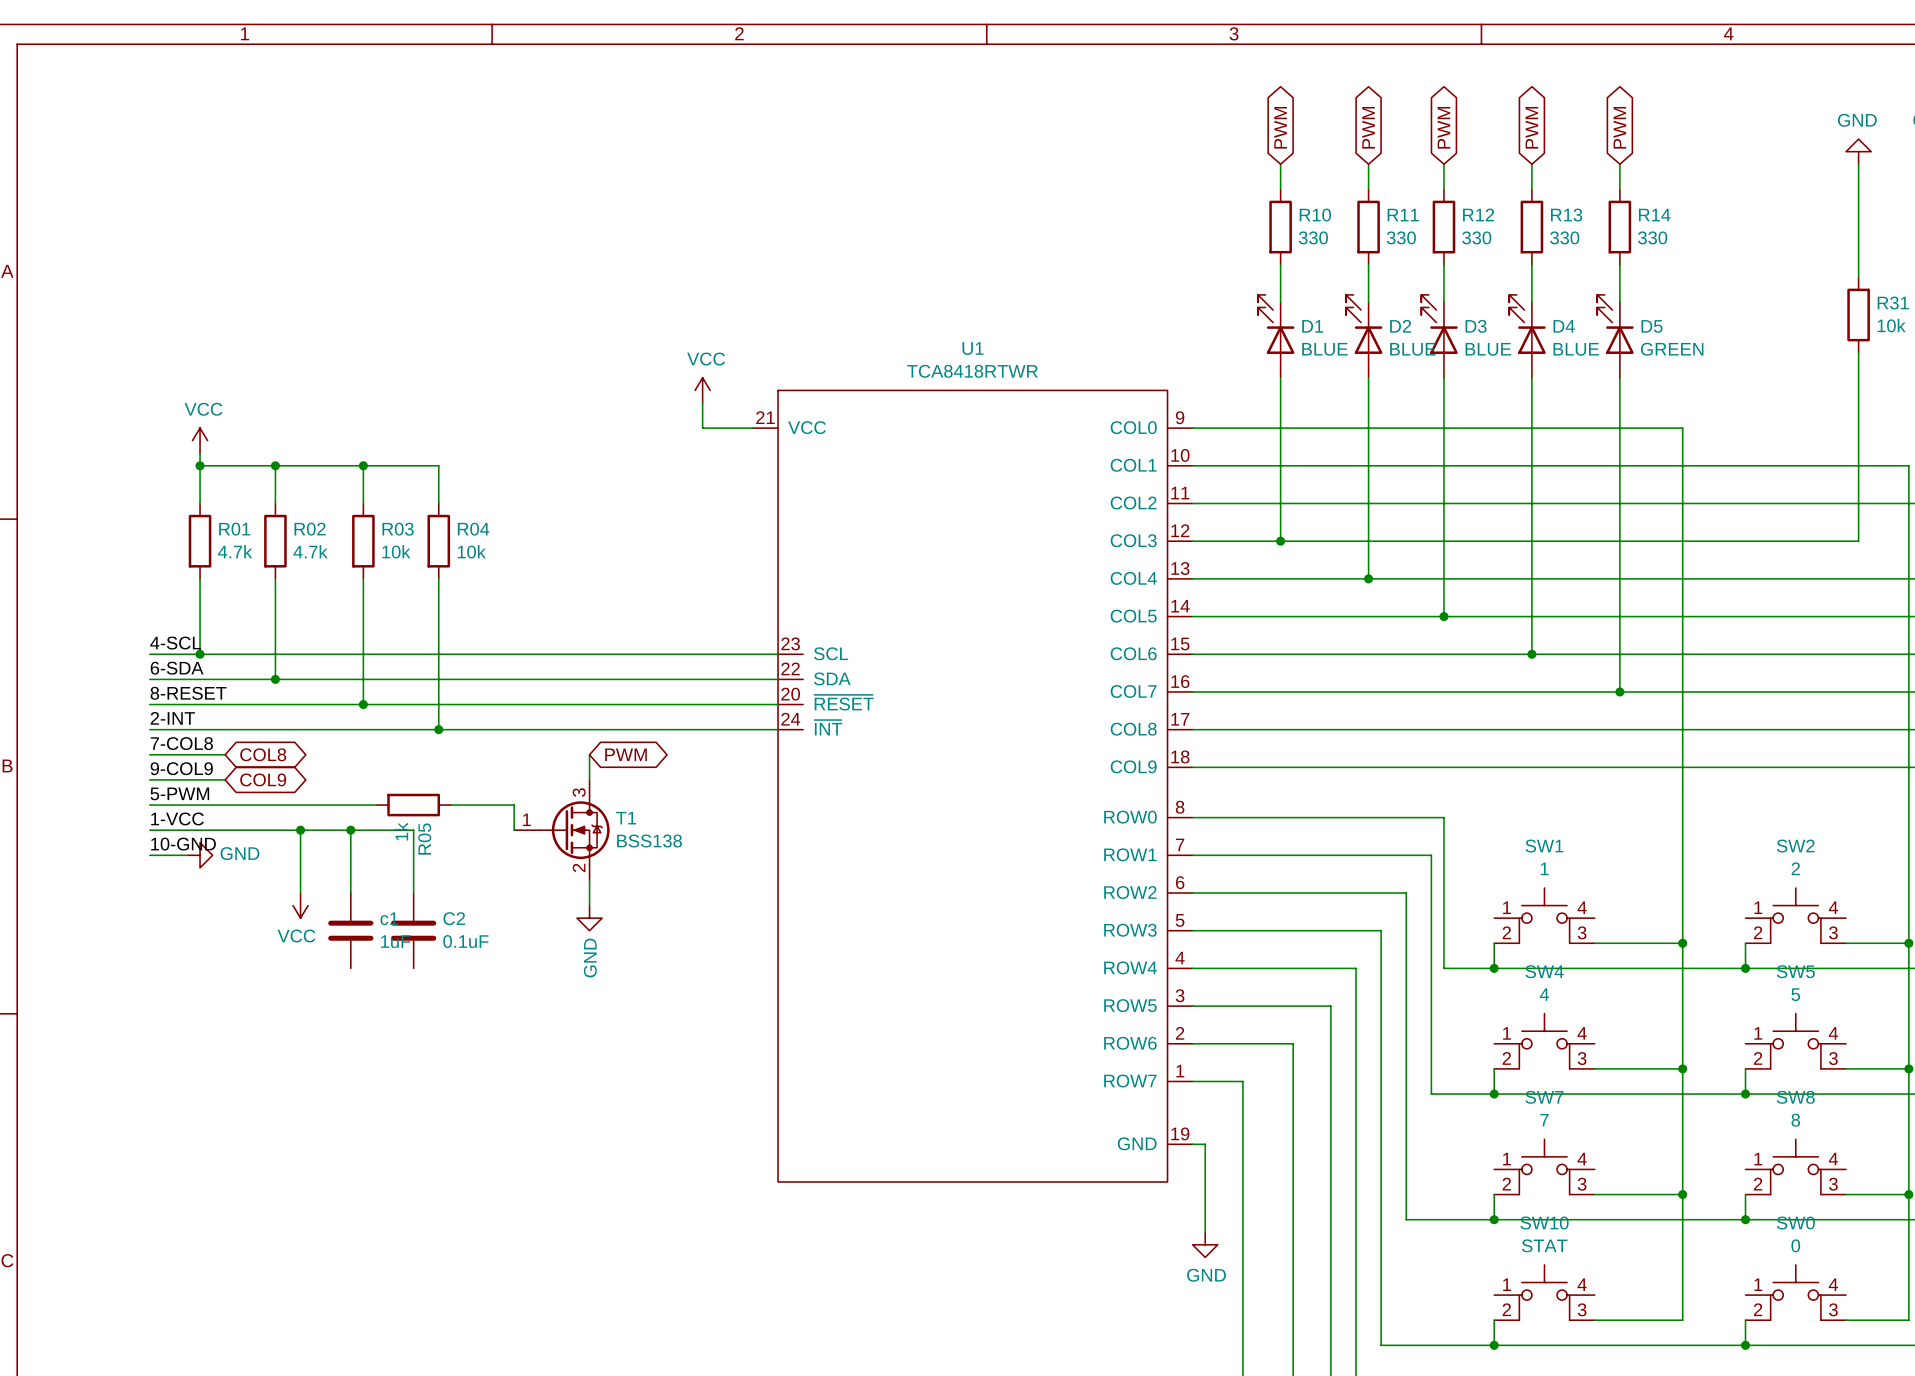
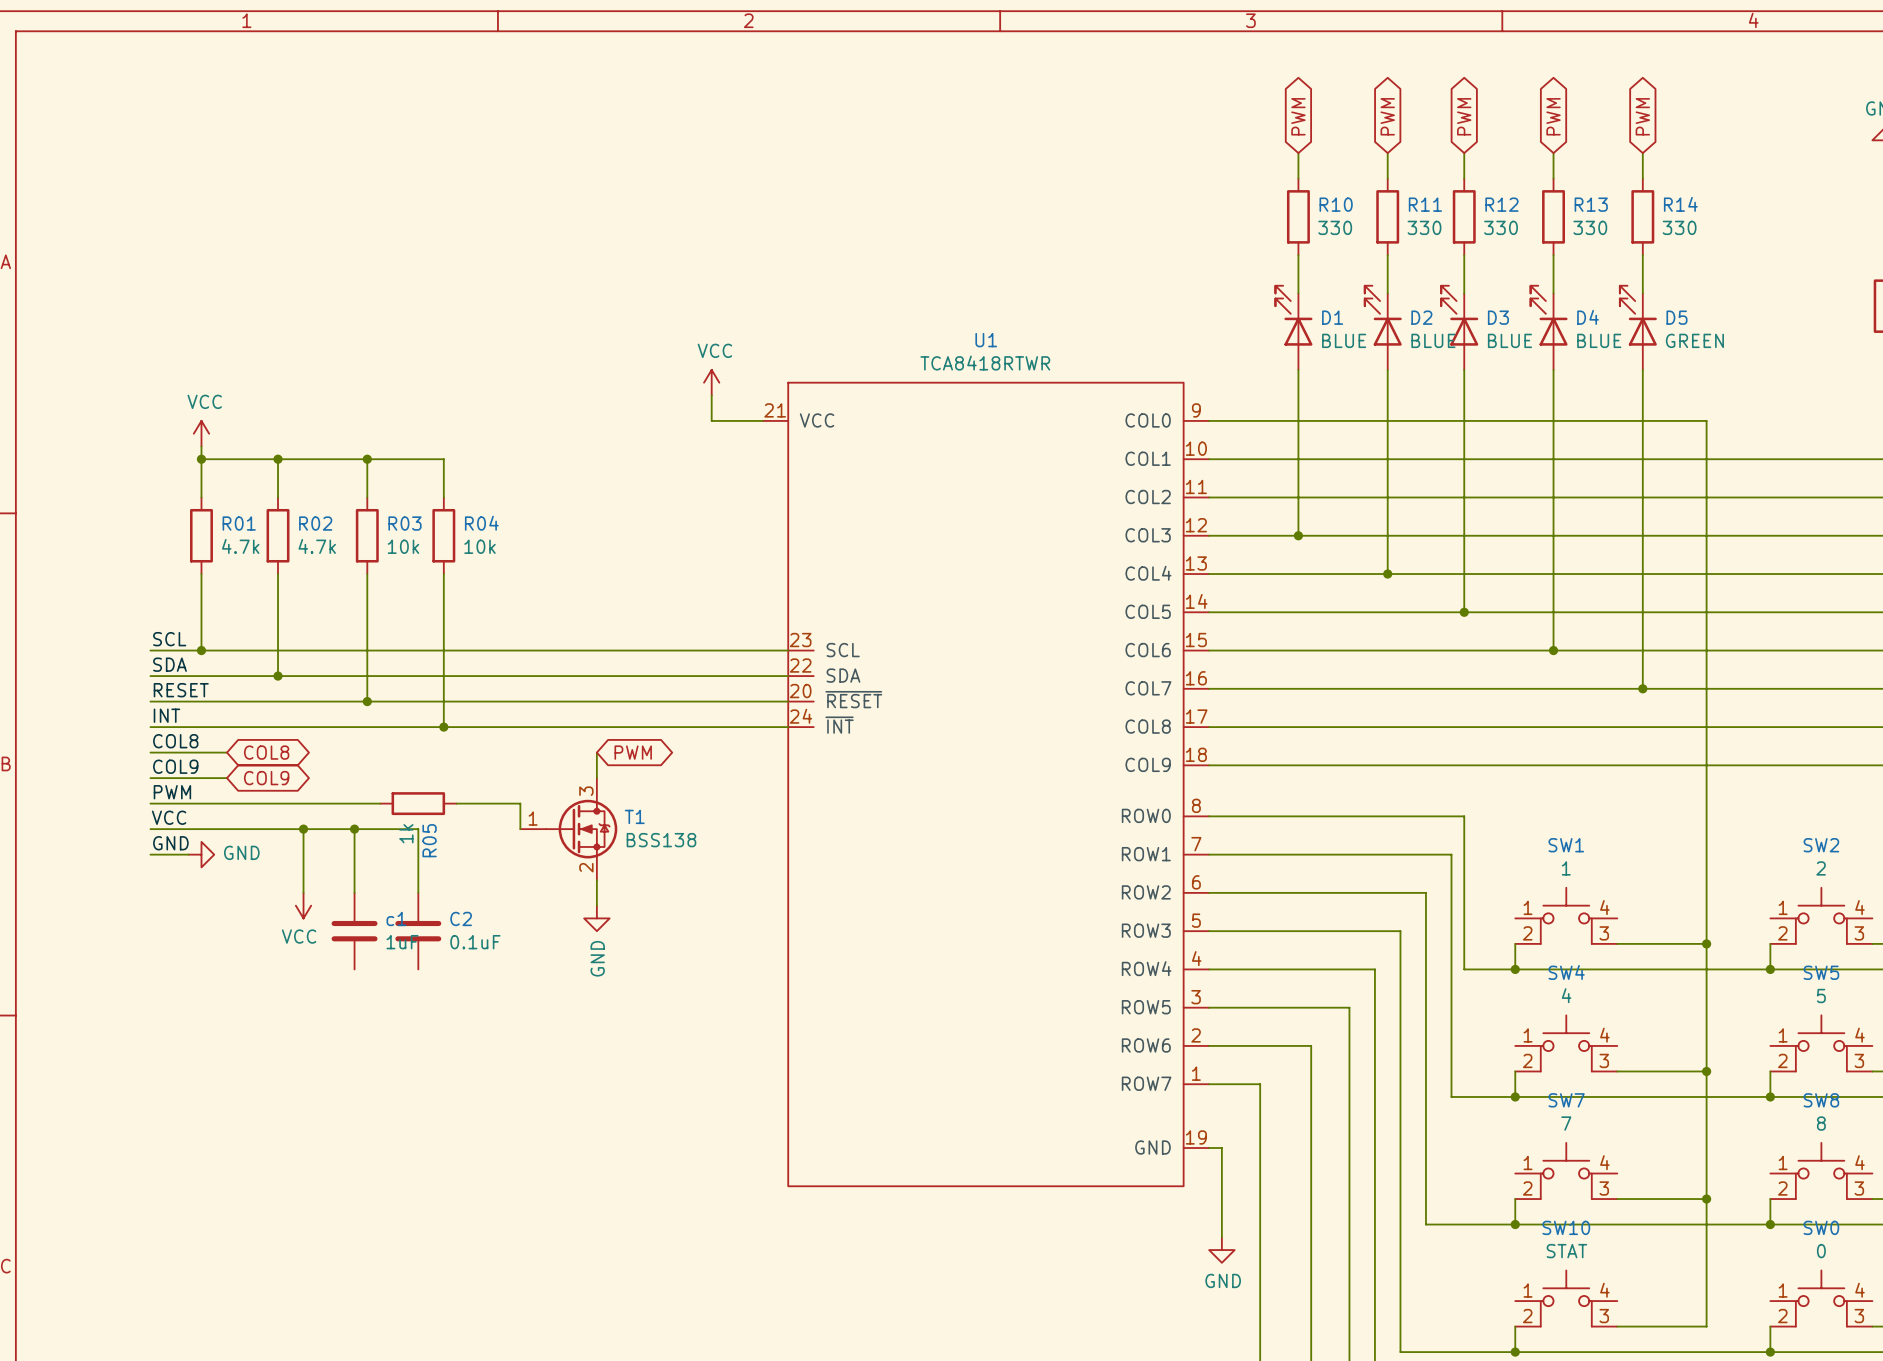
label: 4-SCL (175, 643) -> SCL (169, 639)
label: 6-SDA (177, 668) -> SDA (169, 664)
label: 8-RESET (188, 693) -> RESET (181, 690)
label: 2-INT (172, 718) -> INT (166, 715)
label: 7-COL8 (181, 743) -> COL8 (175, 741)
label: 9-COL9 (181, 768) -> COL9 (175, 766)
label: 5-PWM (179, 793) -> PWM (172, 792)
label: 1-VCC (177, 818) -> VCC (169, 817)
label: 10-GND (183, 844) -> GND (170, 843)

